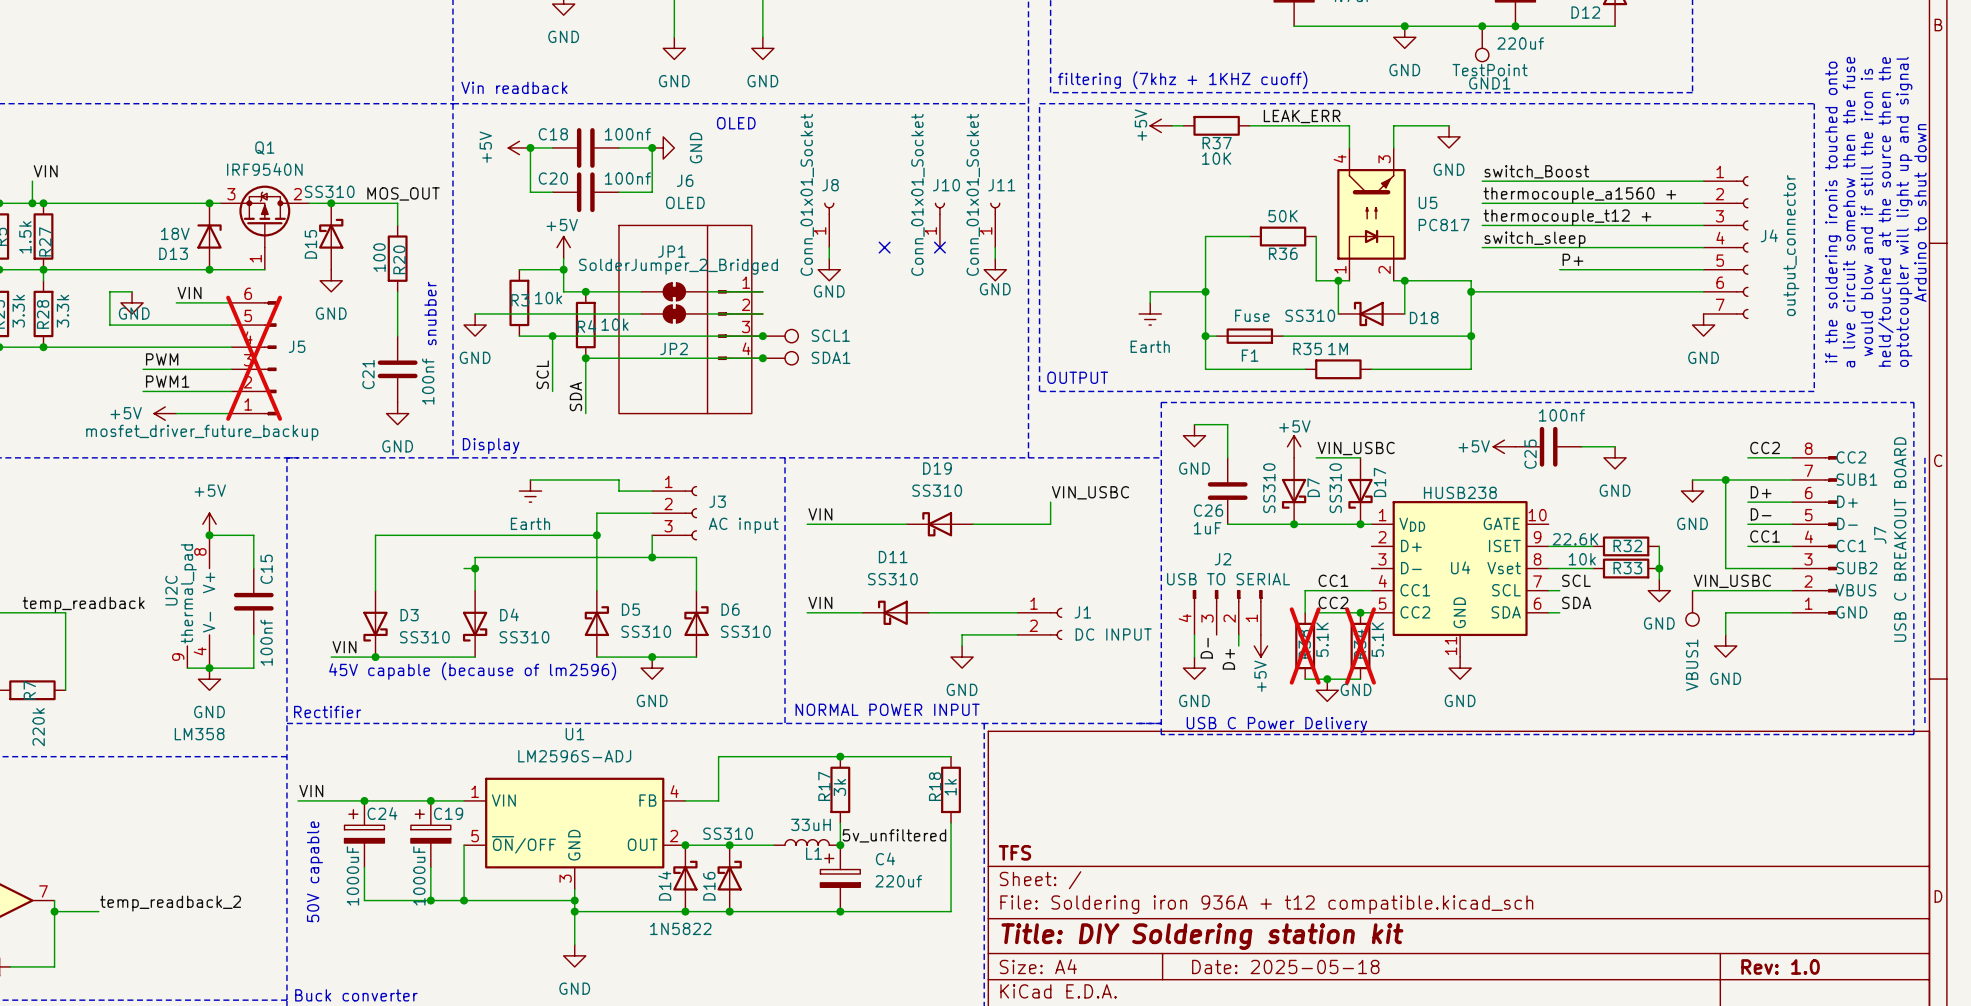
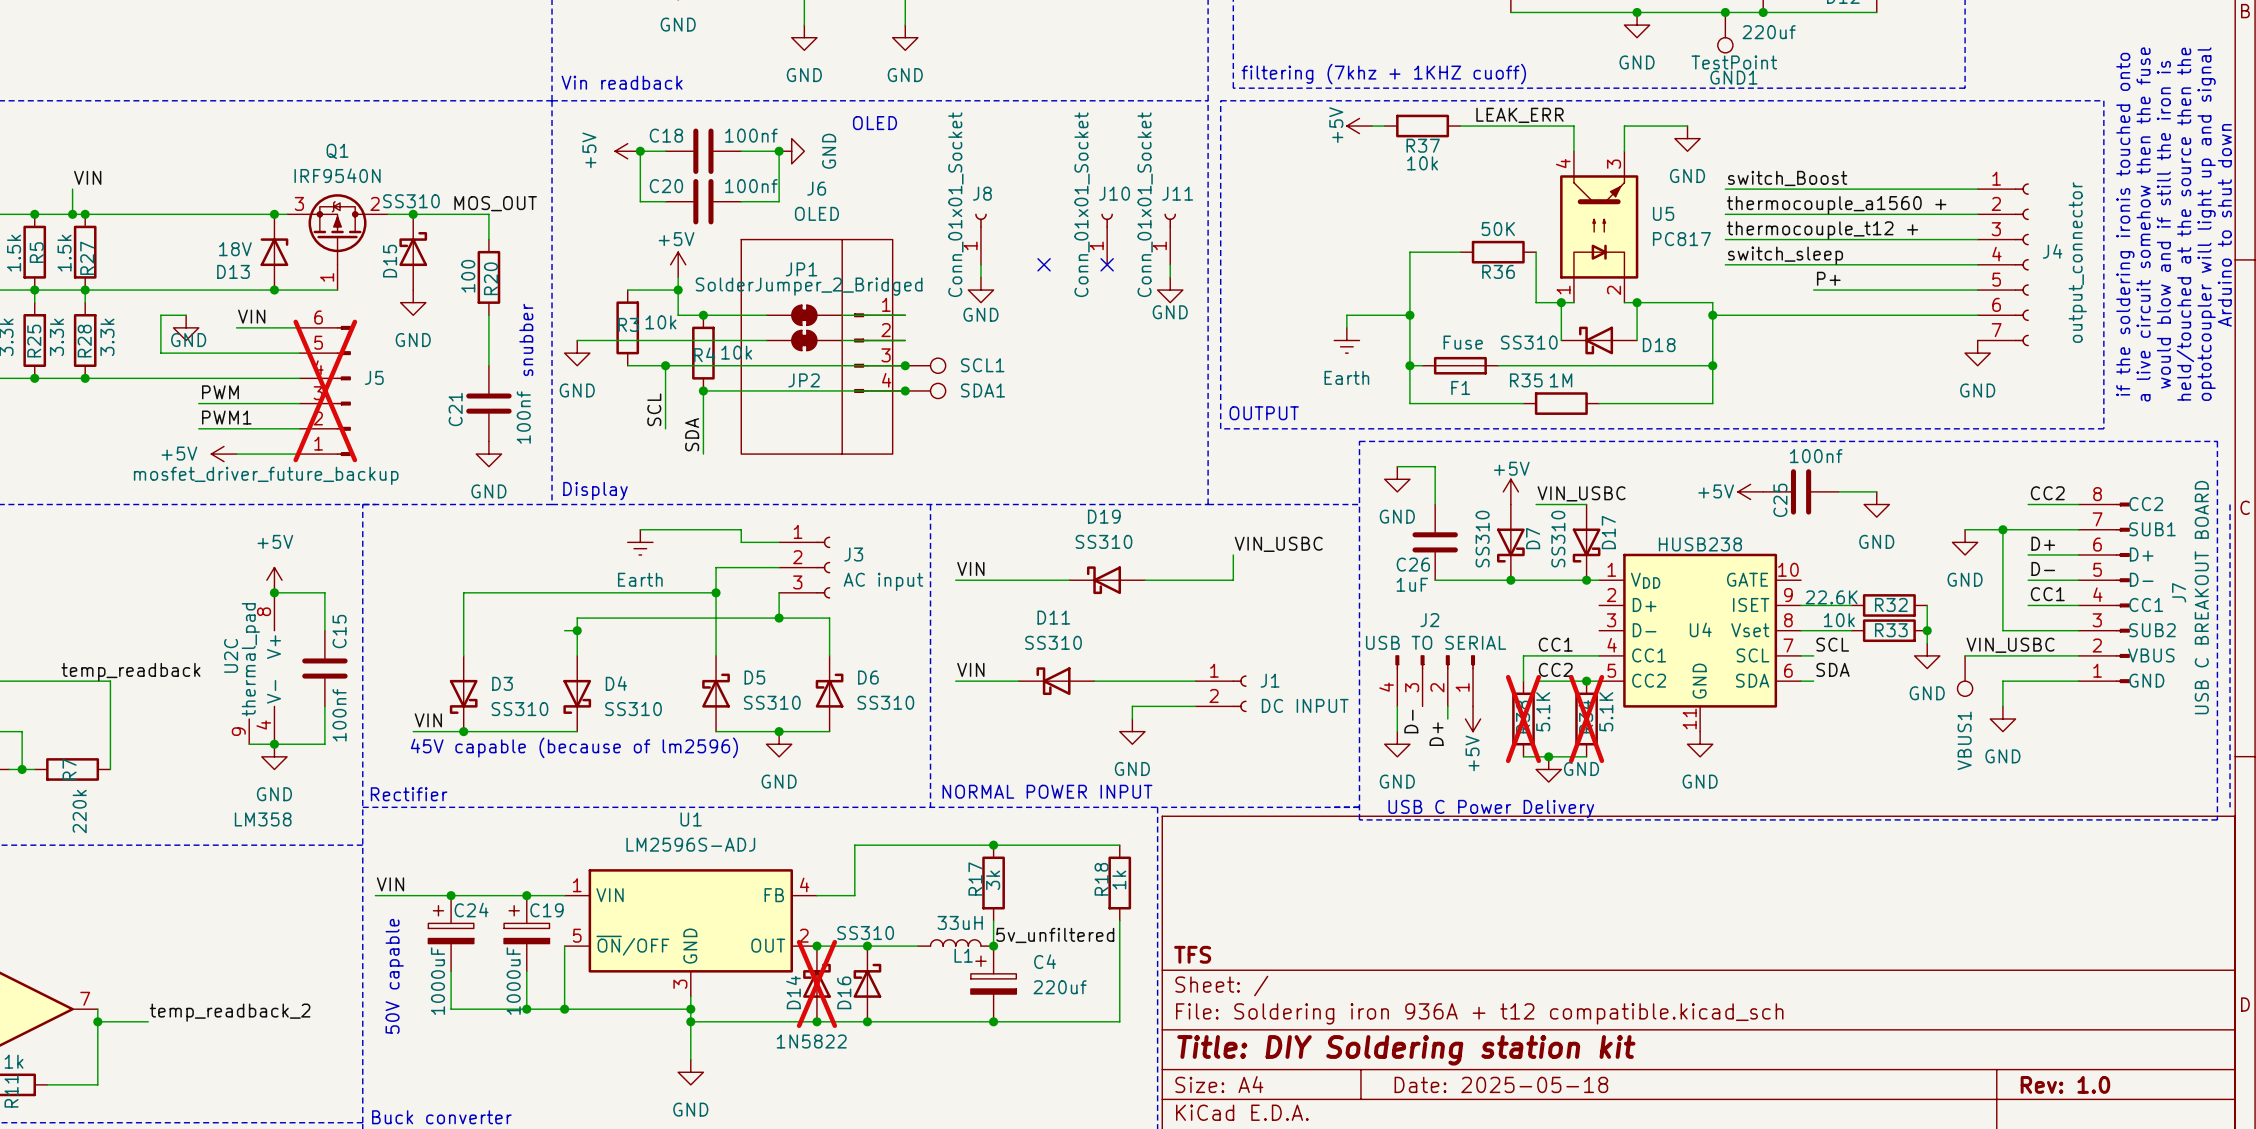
R37 value: 10K (1216, 158) -> 10k (1422, 163)
D14 do-not-place cross: none -> (816, 983)

